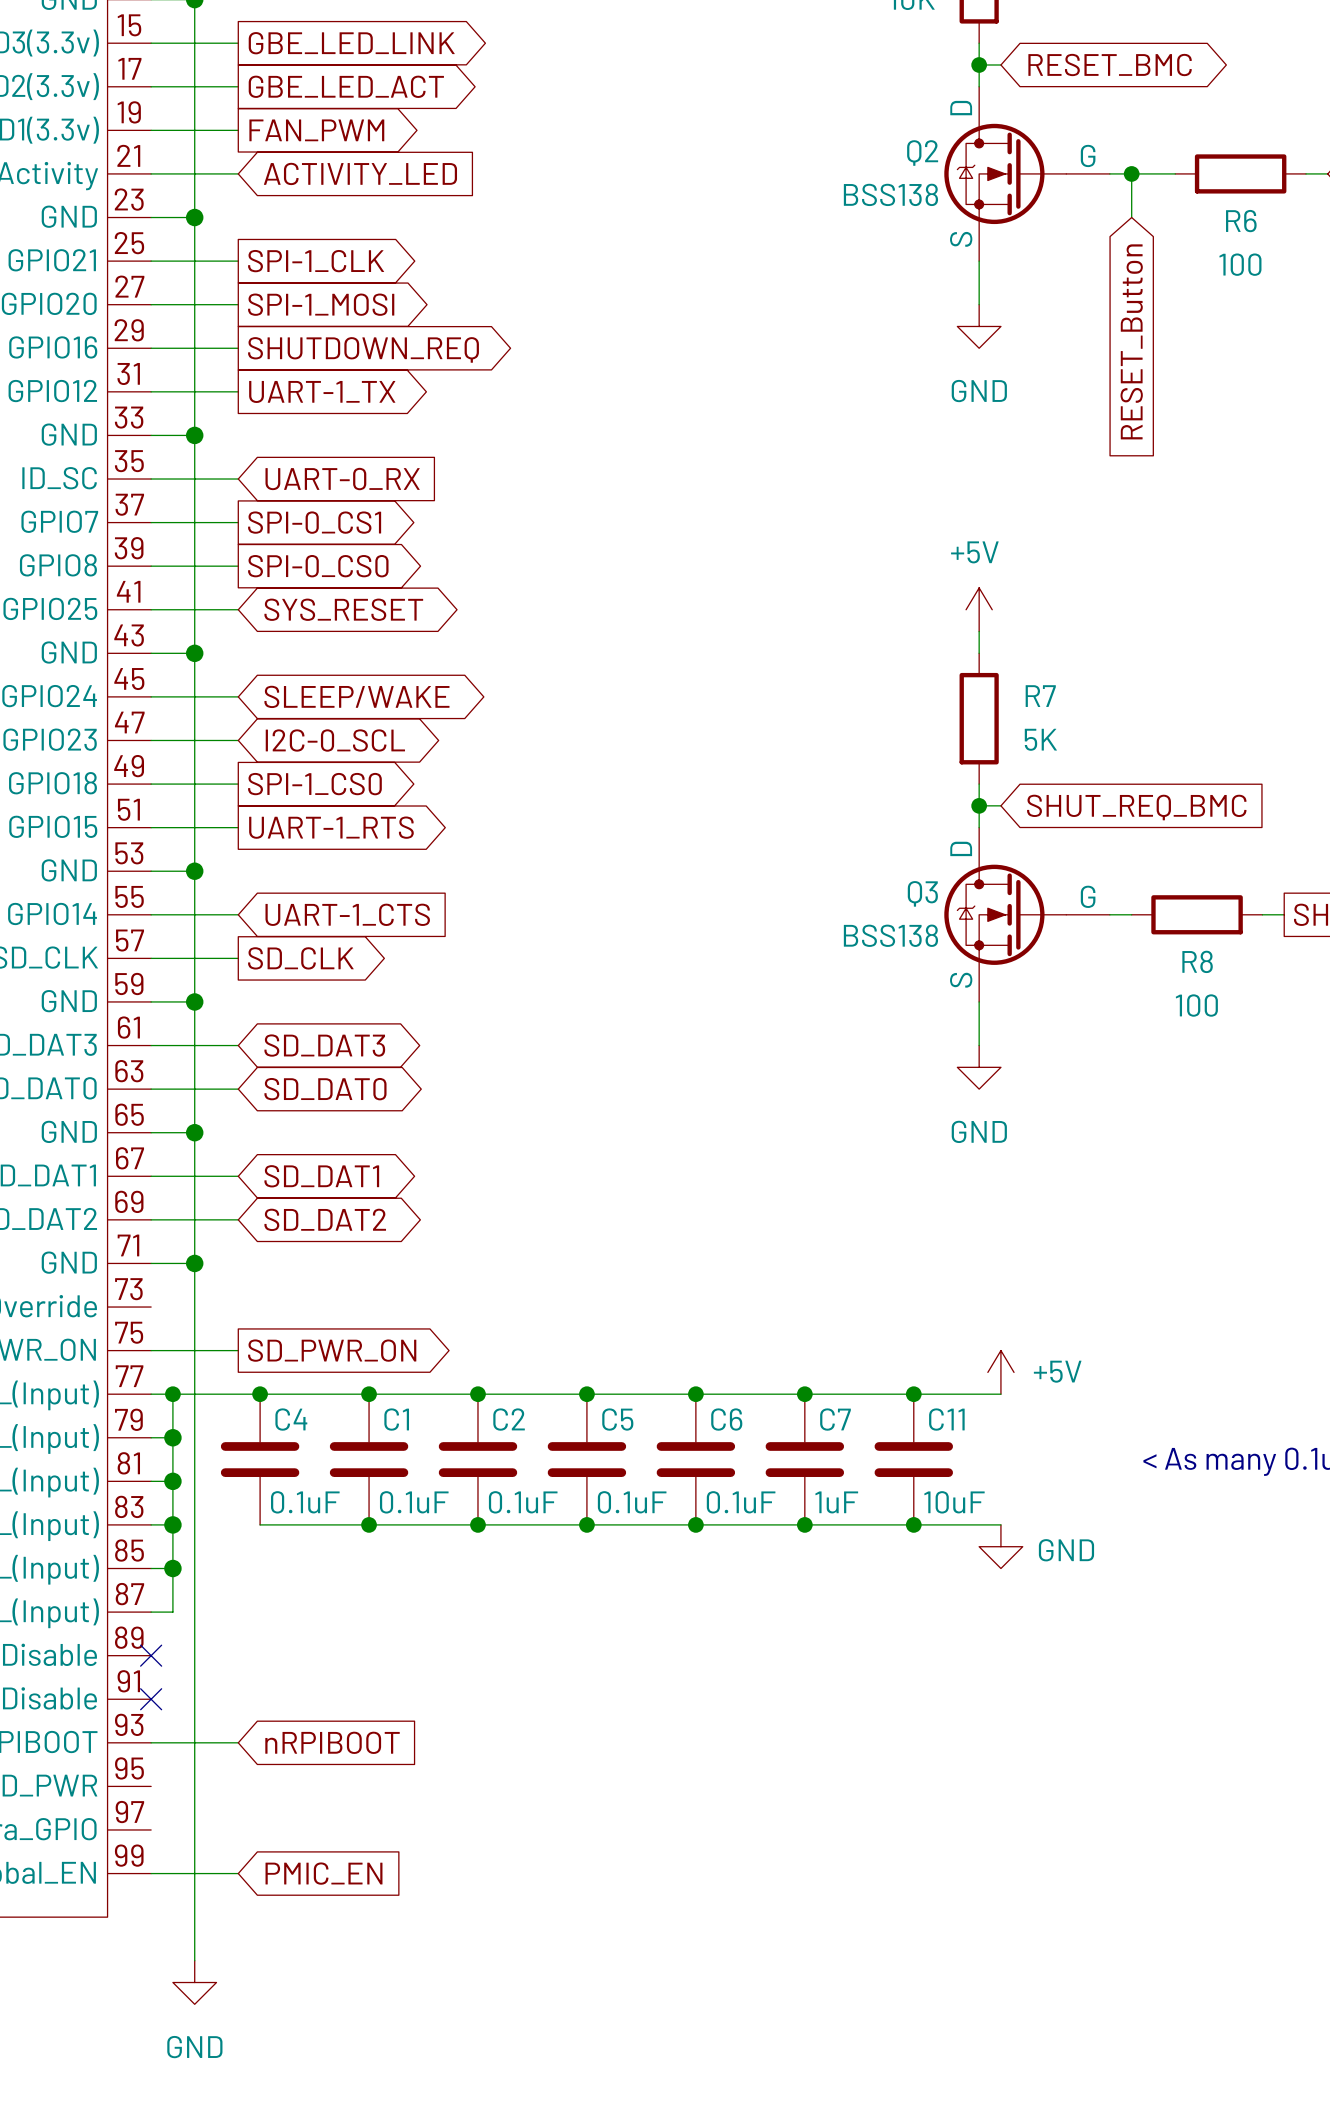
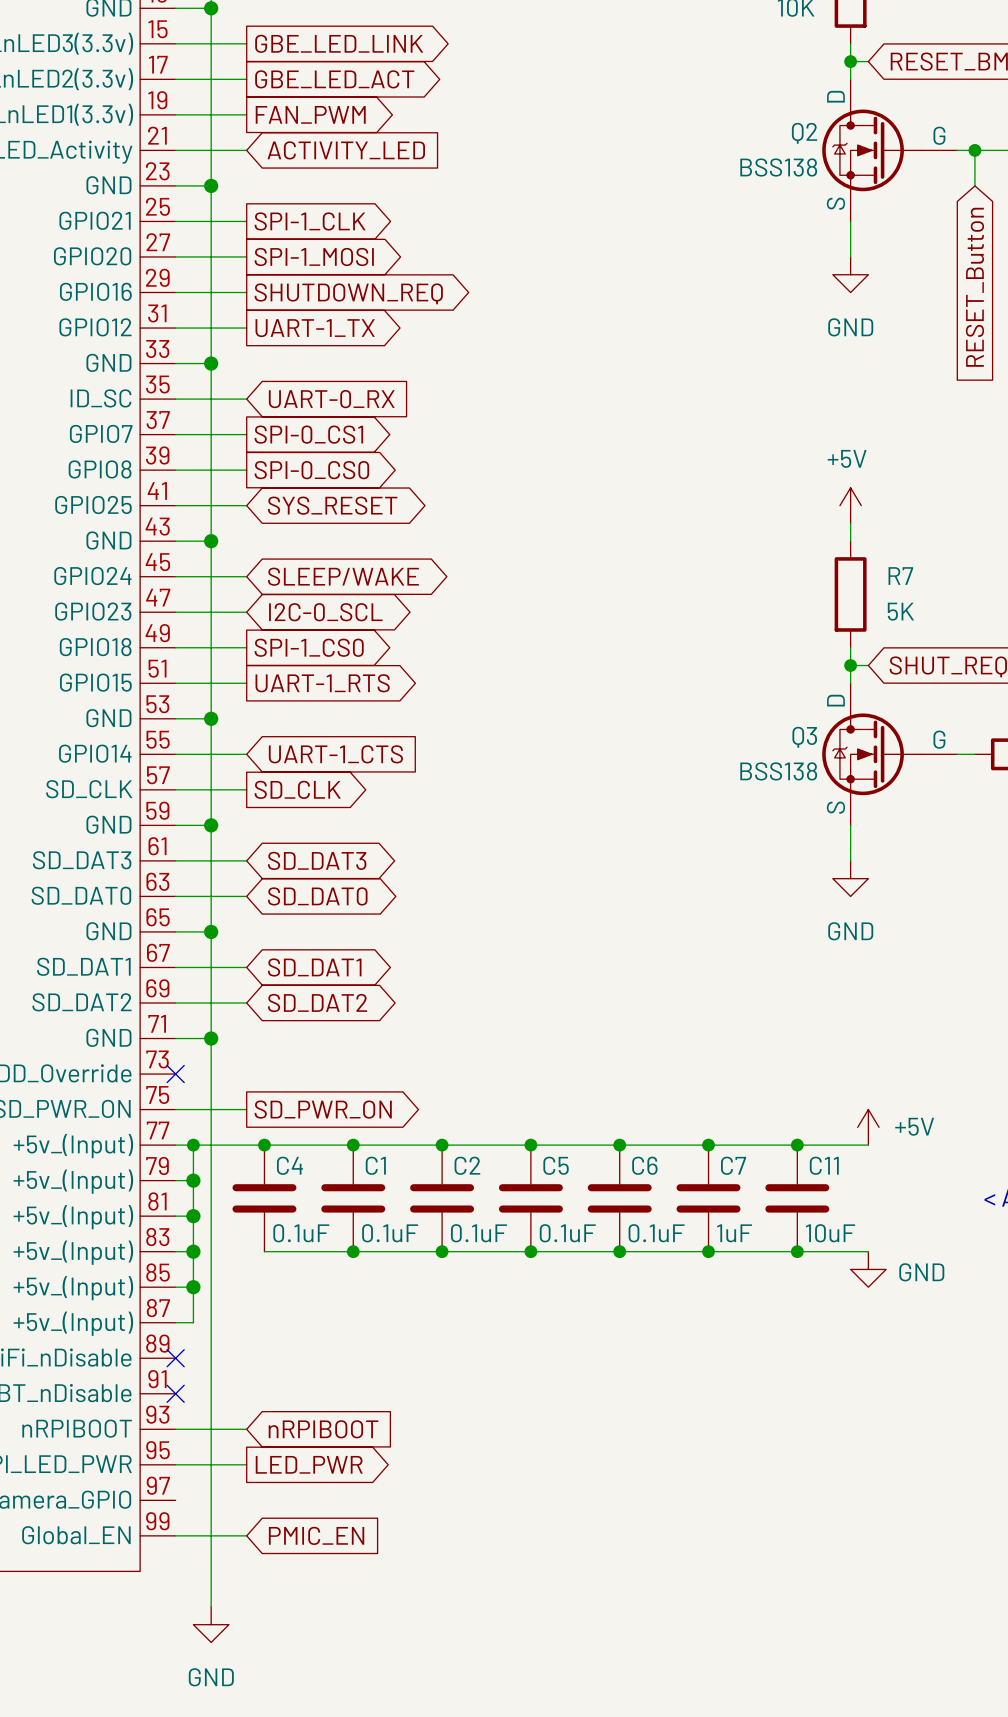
no-connect mark: none -> (175, 1074)
wire: none -> (175, 1464) (246, 1464)
global label: none -> LED_PWR (309, 1464)

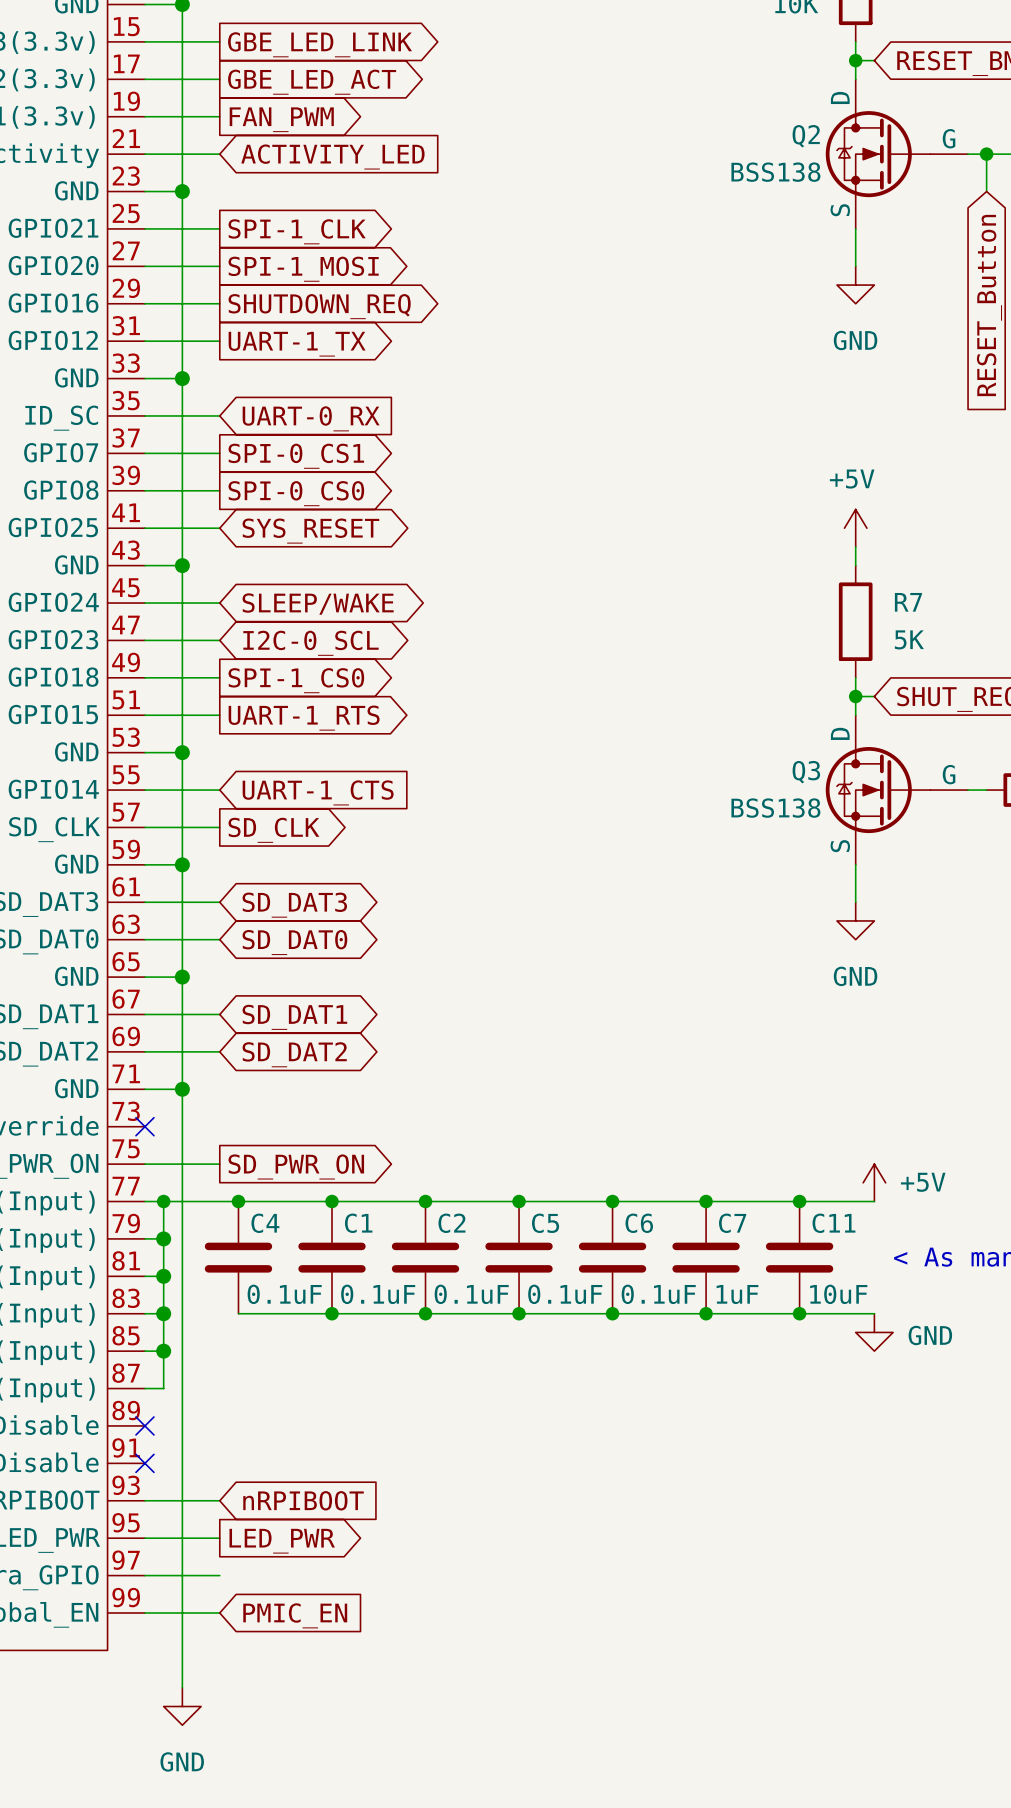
wire: none -> (144, 1575) (219, 1575)

